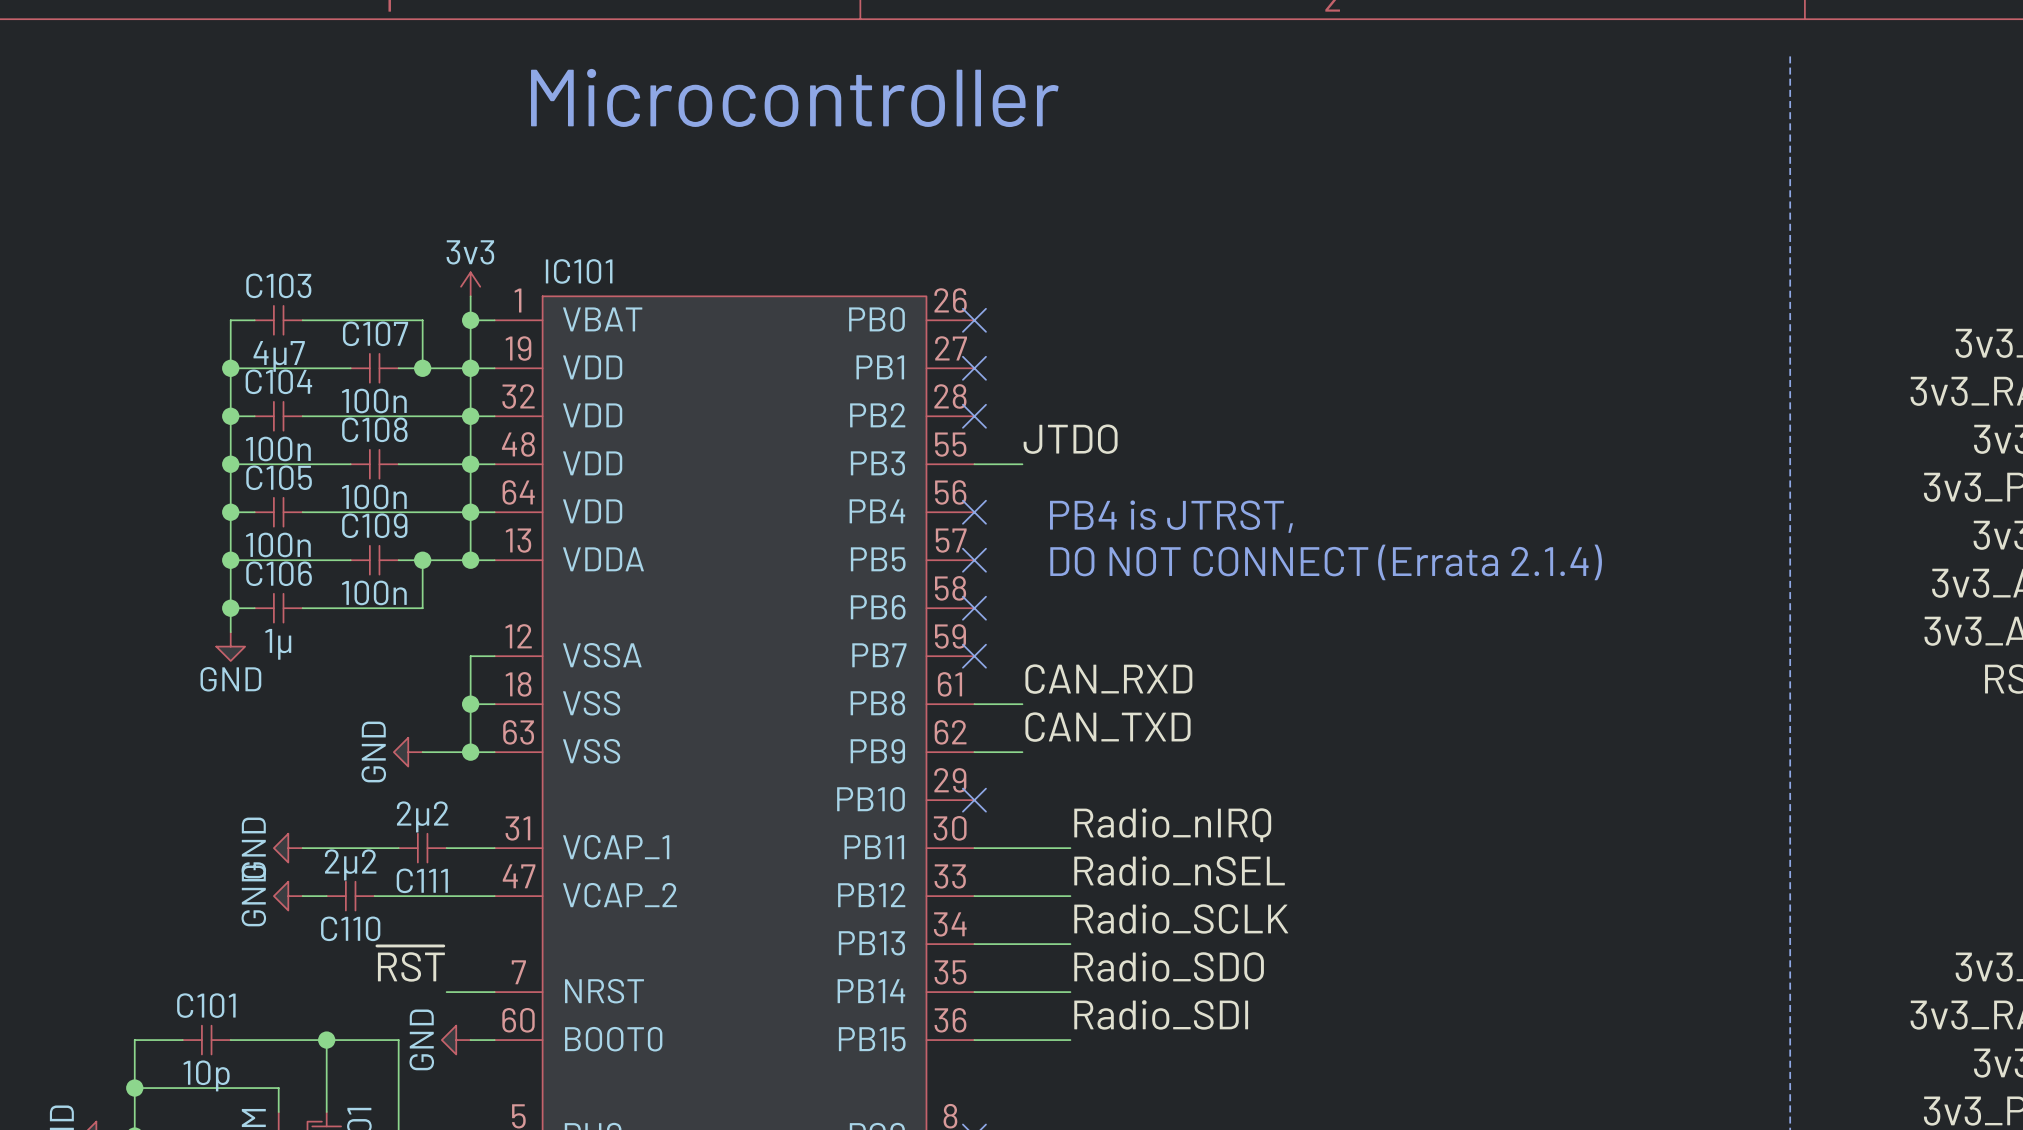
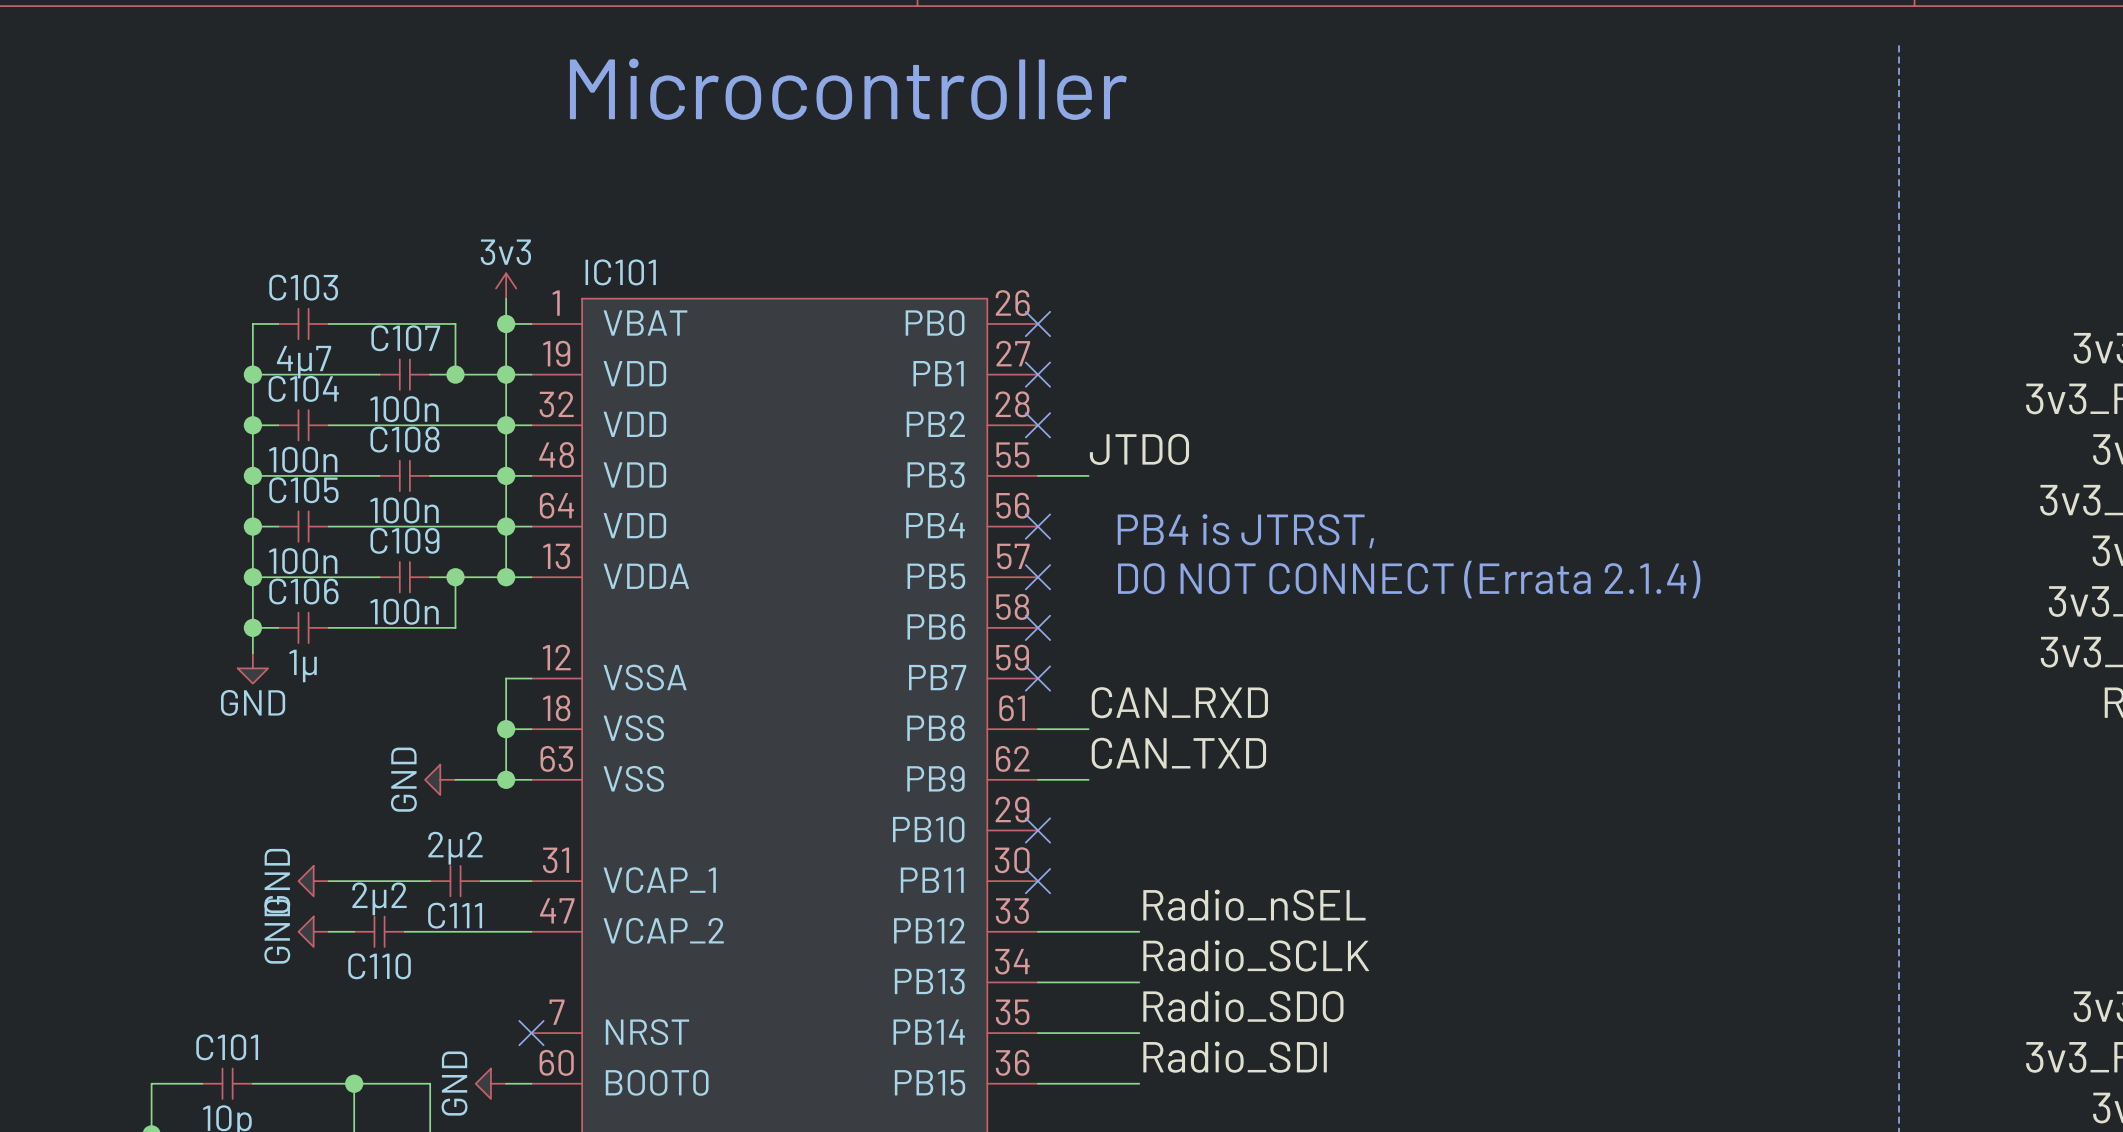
label: Radio_nIRQ (1172, 825) -> none
wire: (974, 848) (1070, 848) -> none
no-connect mark: none -> (1037, 881)
label: ~{RST} (410, 963) -> none
wire: (446, 992) (494, 992) -> none
no-connect mark: none -> (531, 1033)

